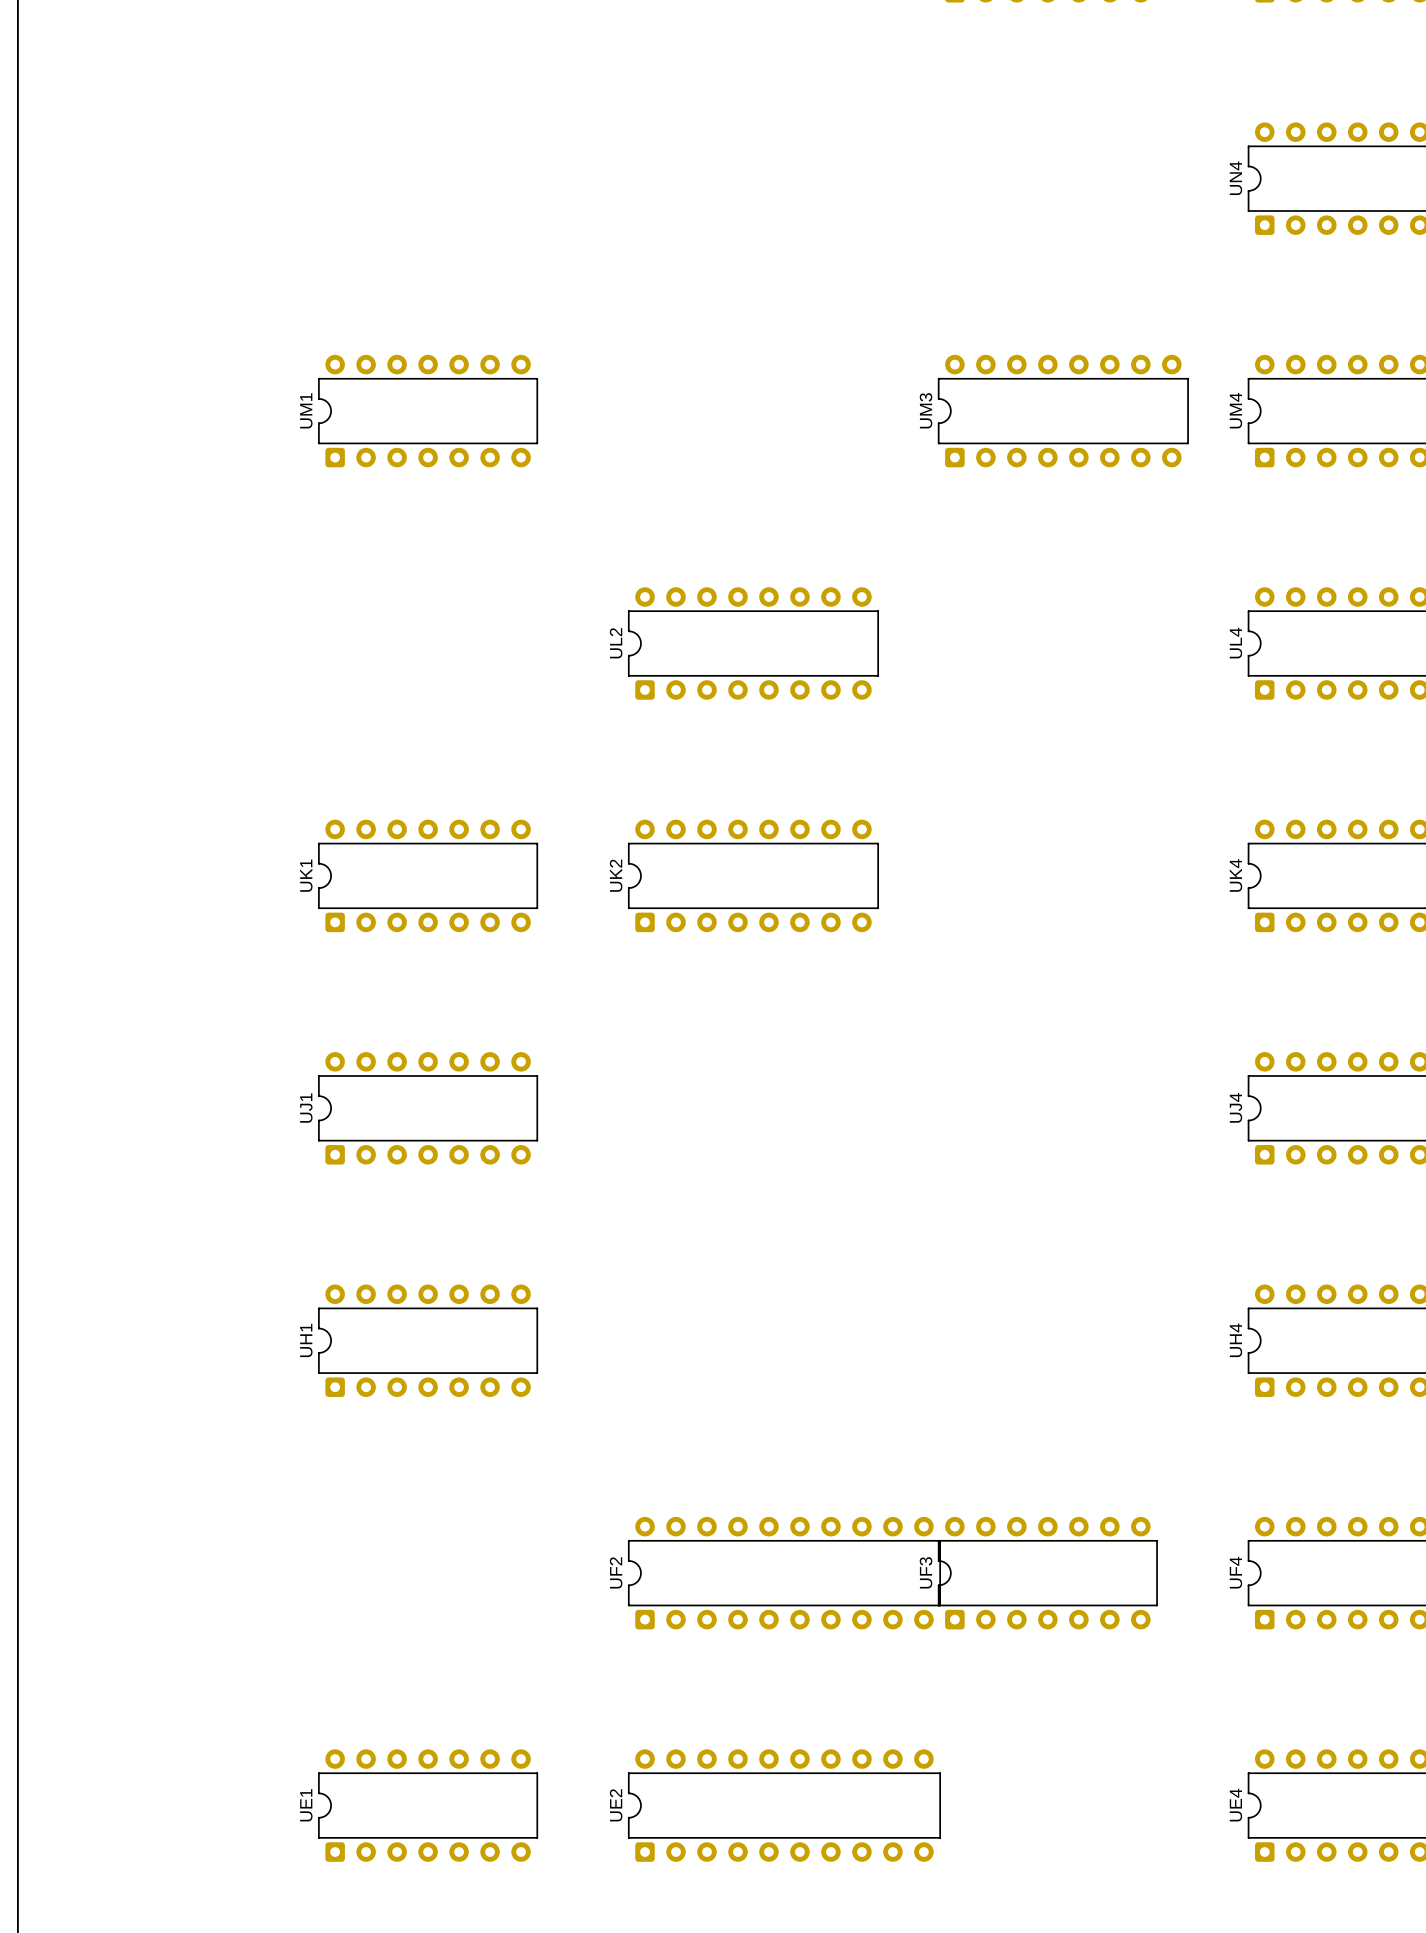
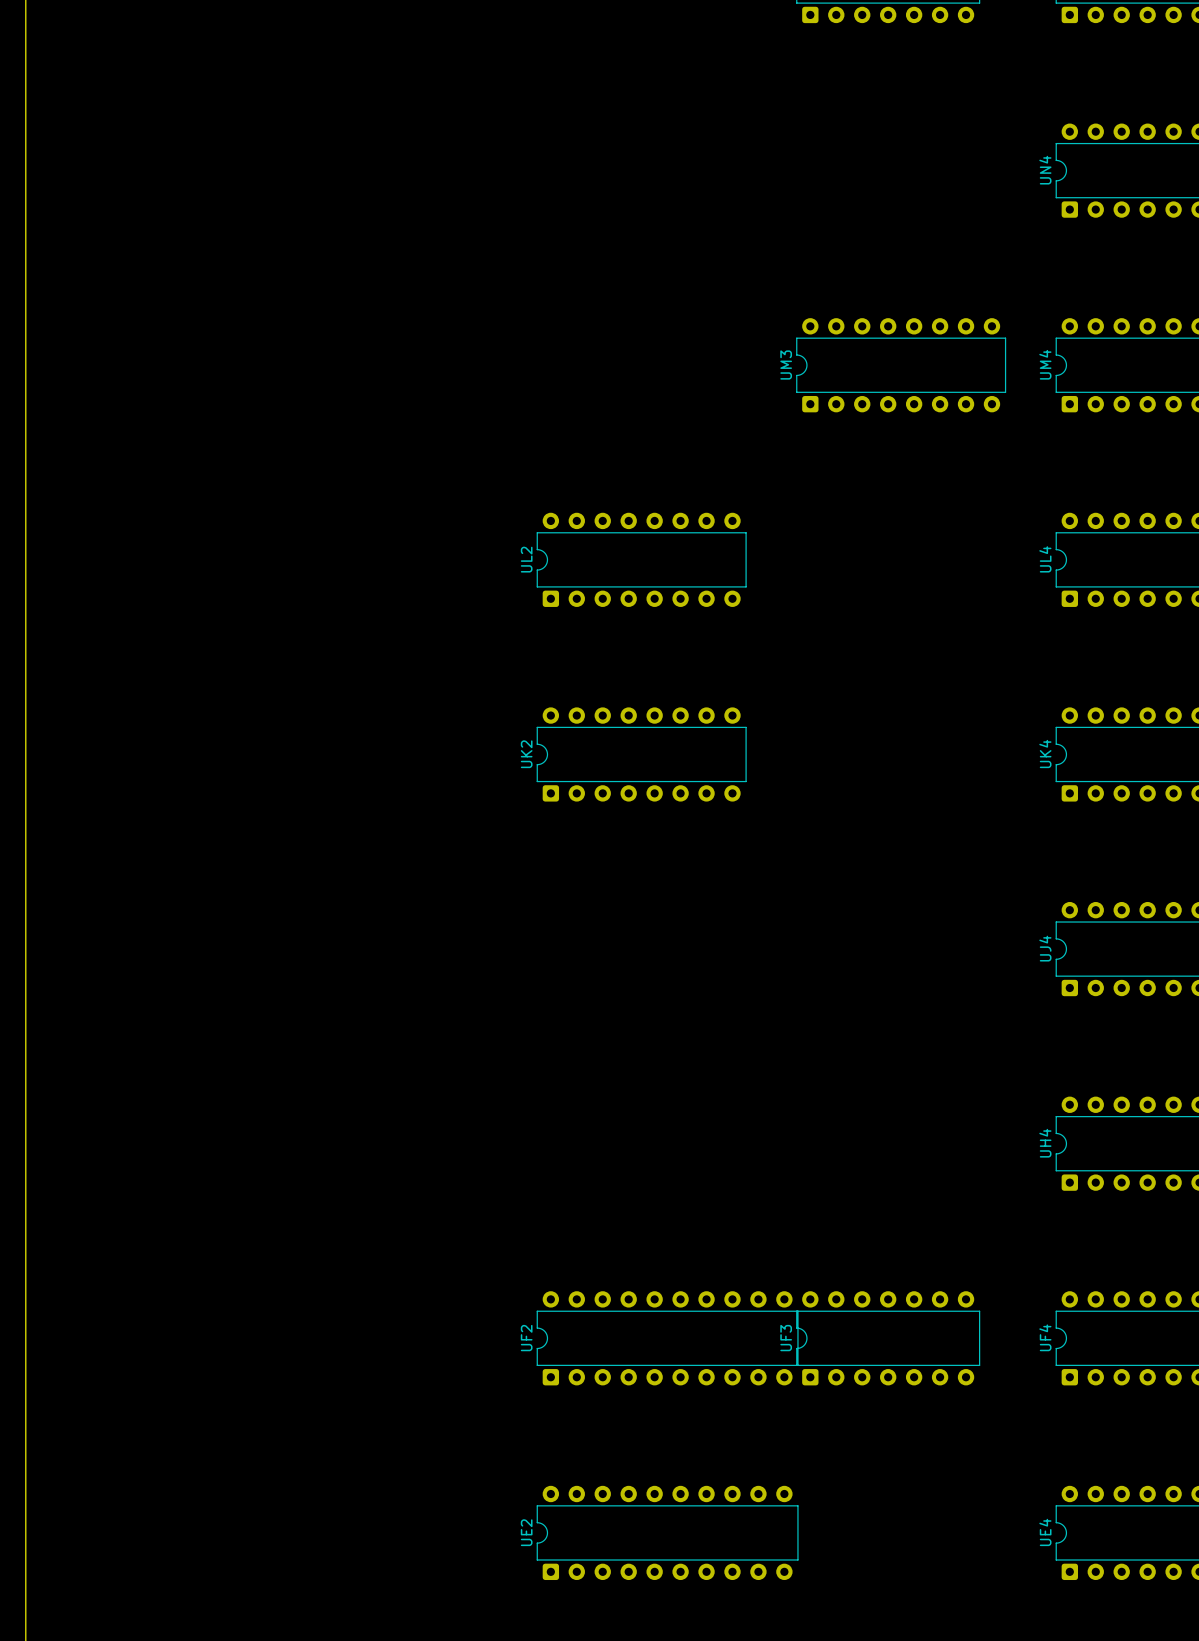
UM1: (428, 411) -> none
UK1: (428, 875) -> none
UJ1: (428, 1108) -> none
UH1: (428, 1340) -> none
UE1: (428, 1805) -> none

